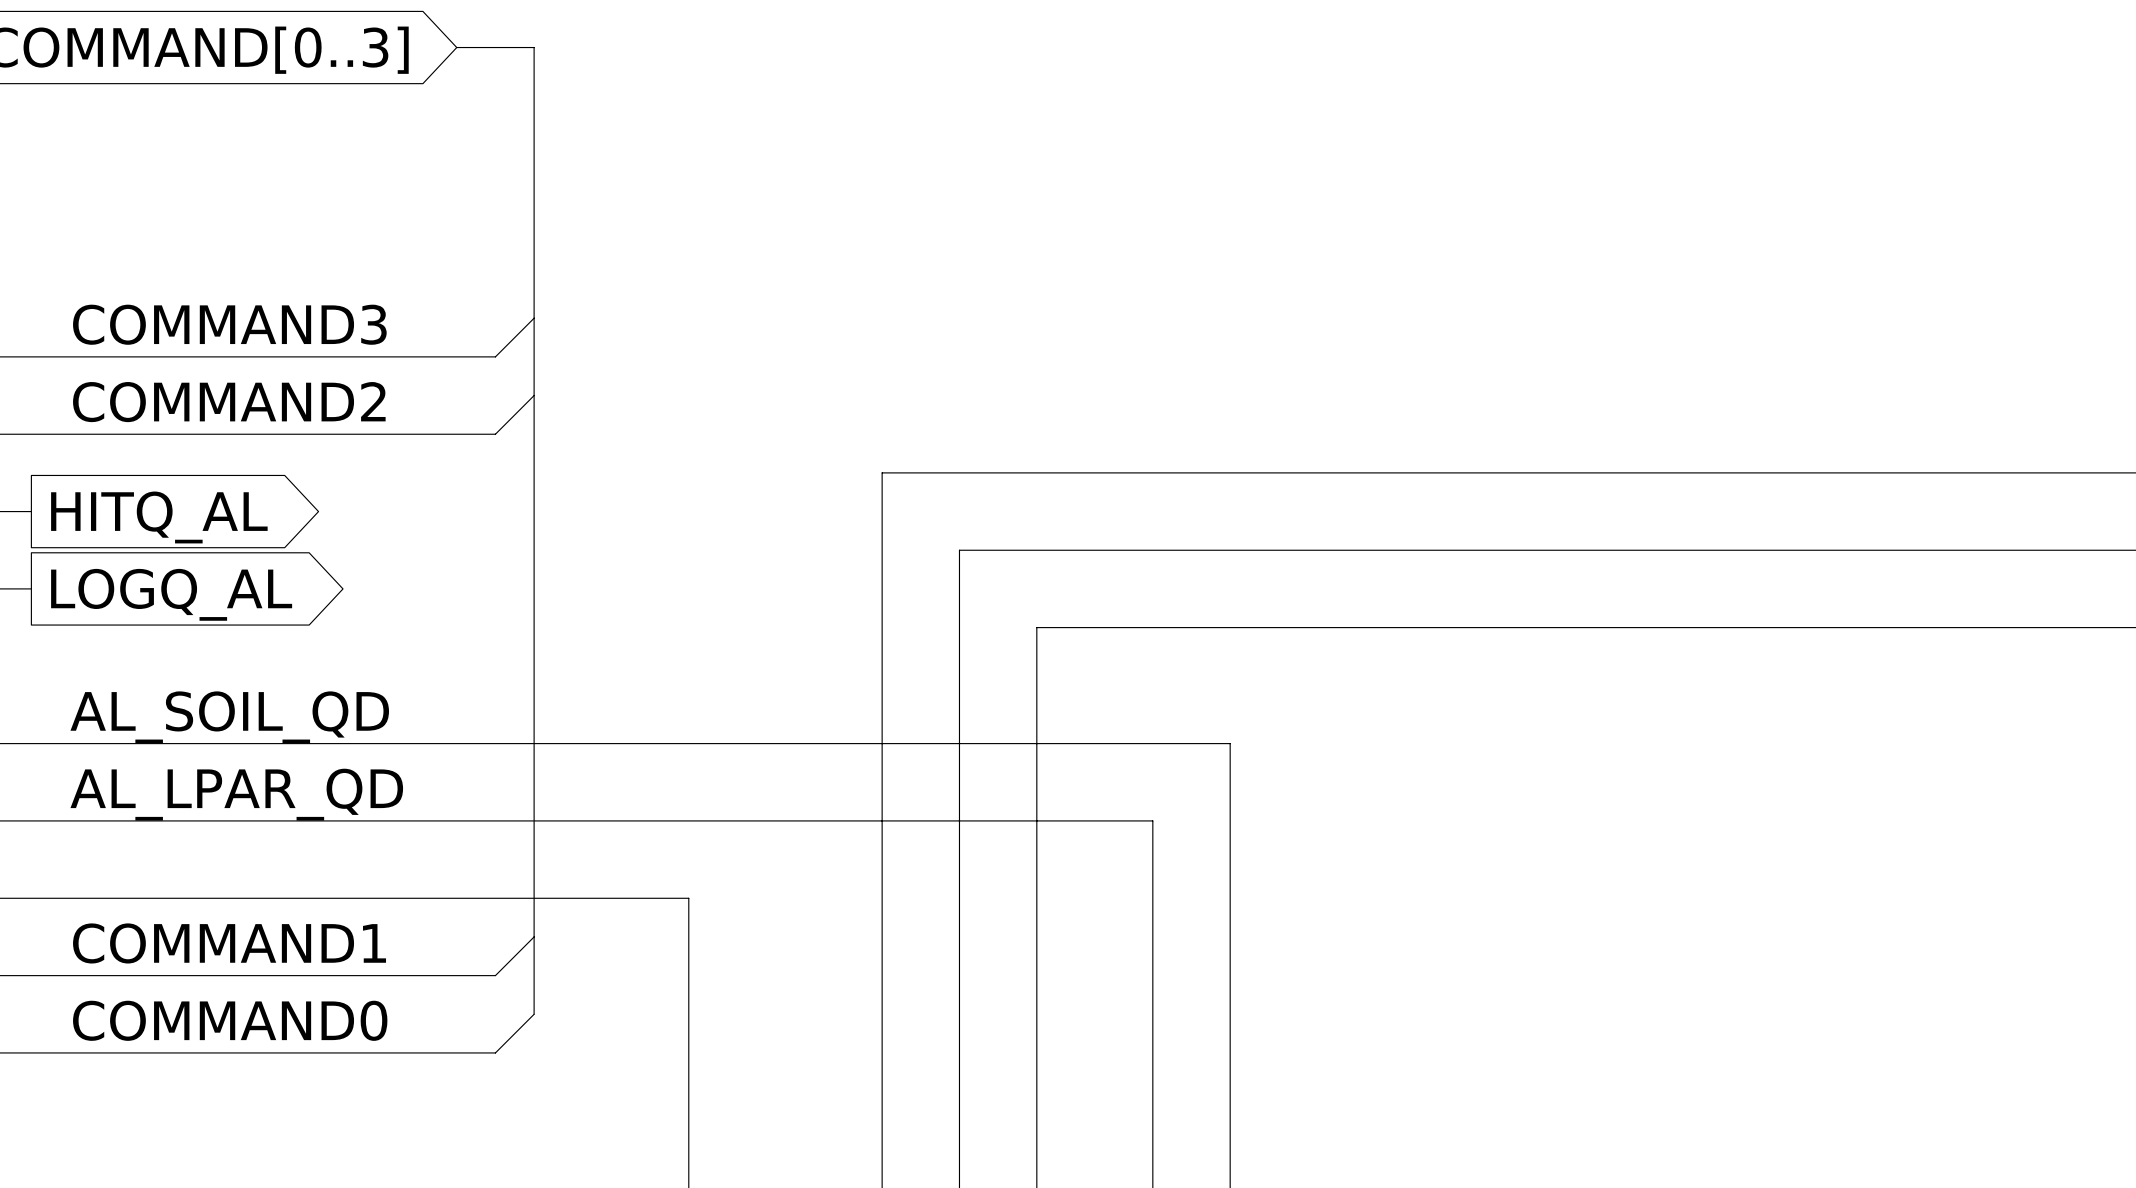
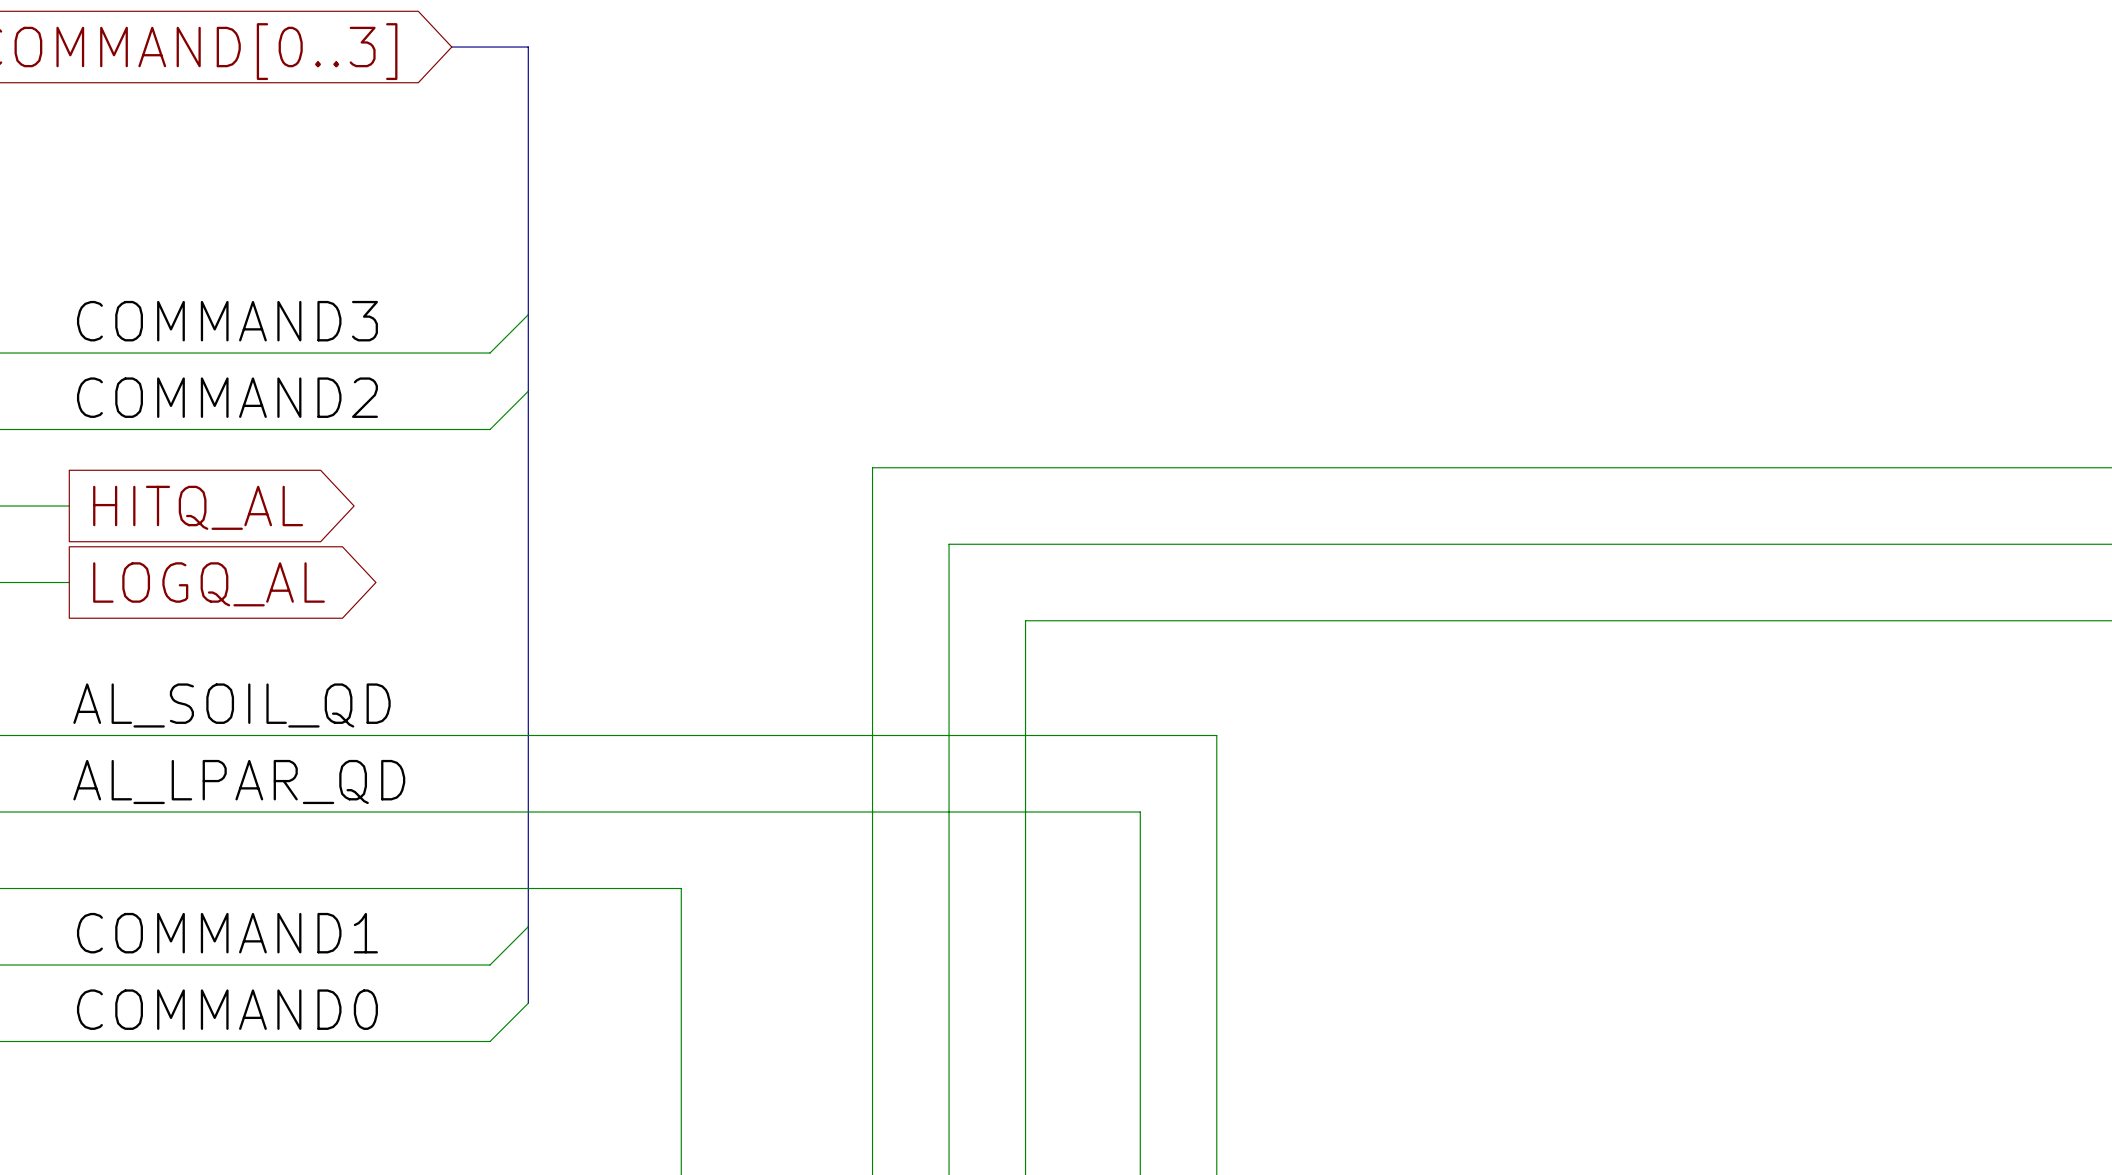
wire: none -> (31, 506) (69, 506)
global label position: HITQ_AL (159, 517) -> HITQ_AL (198, 507)
wire: none -> (31, 582) (69, 582)
global label position: LOGQ_AL (171, 594) -> LOGQ_AL (209, 584)

